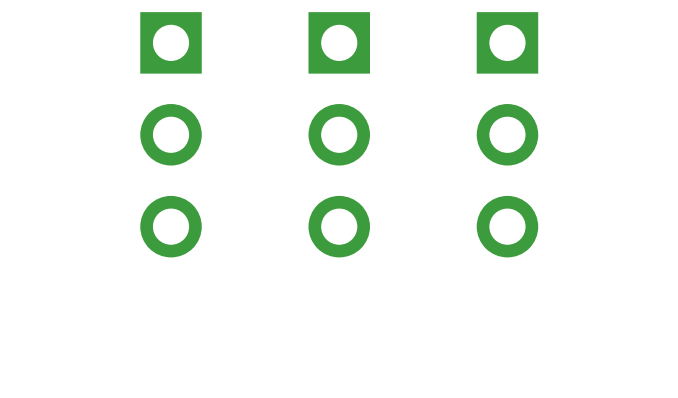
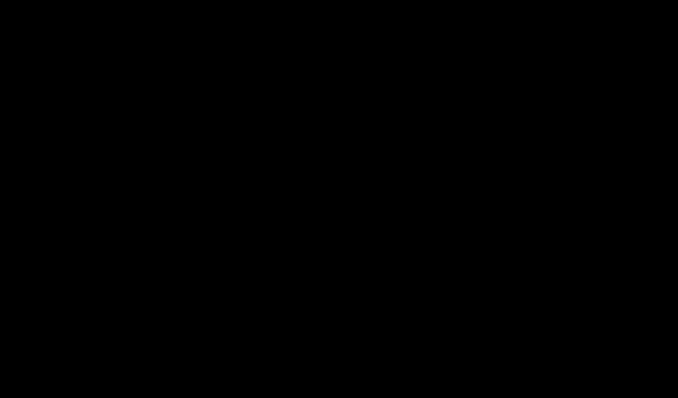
part: (171, 134) -> none
part: (339, 134) -> none
part: (507, 134) -> none

